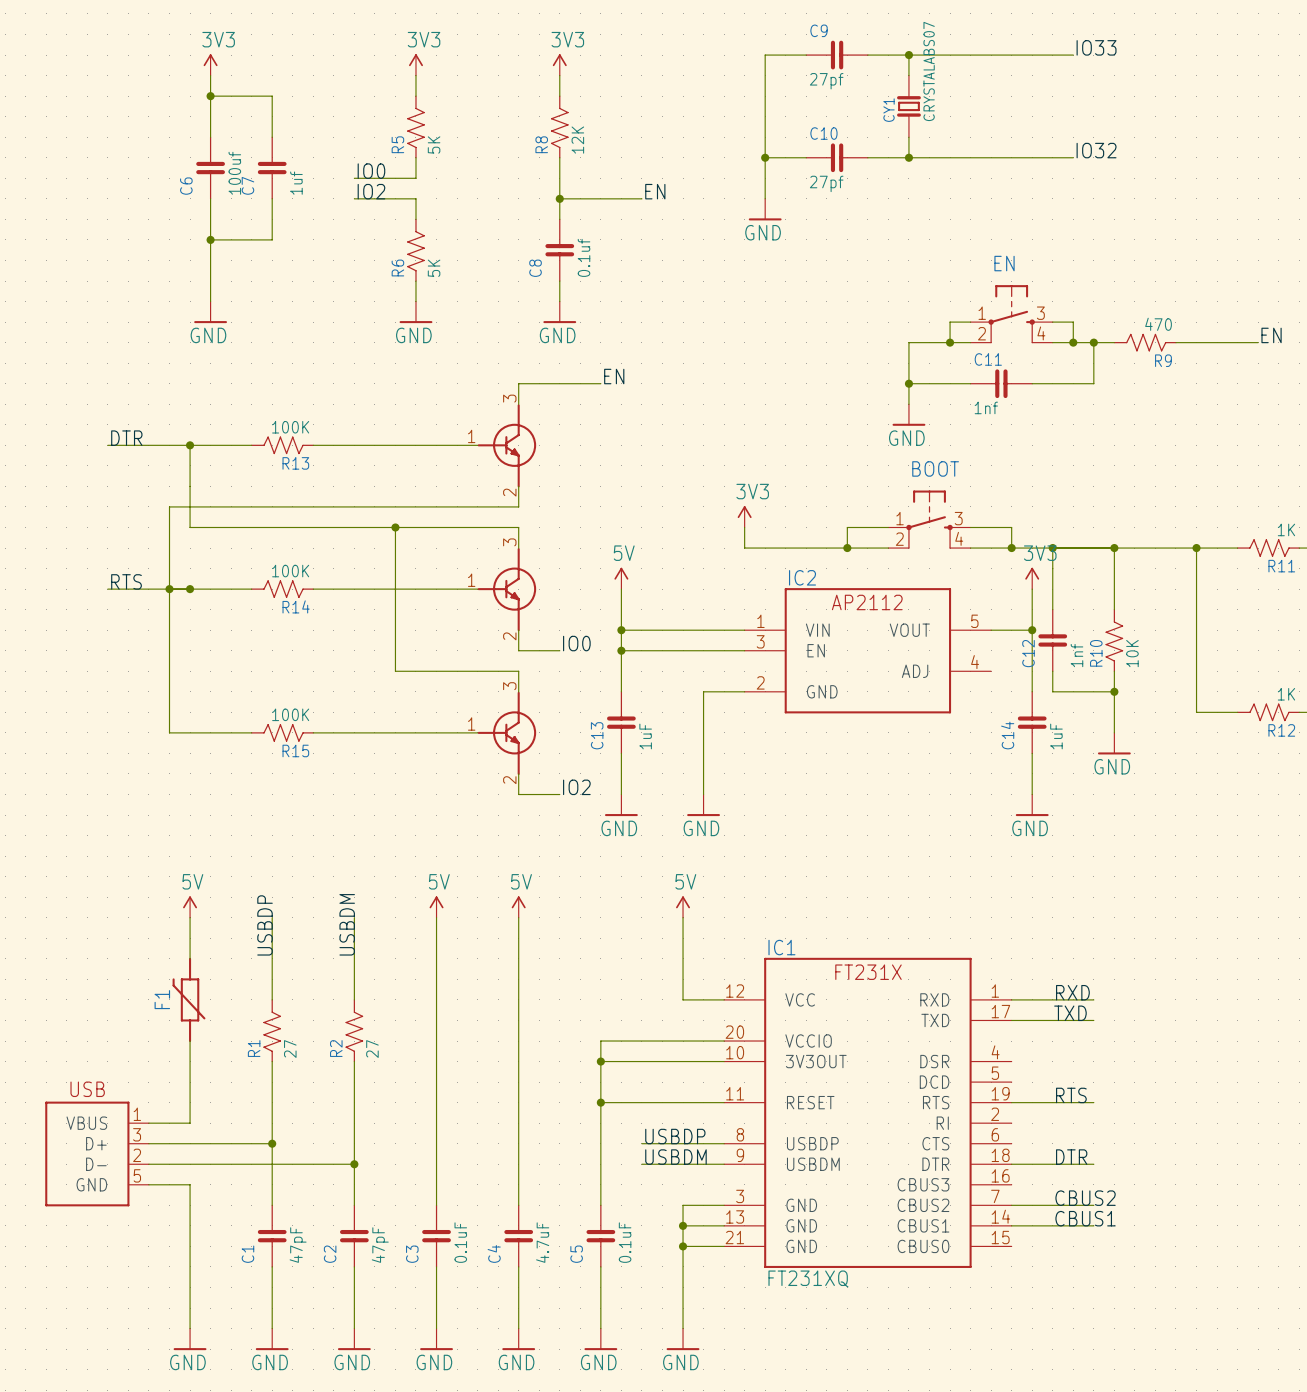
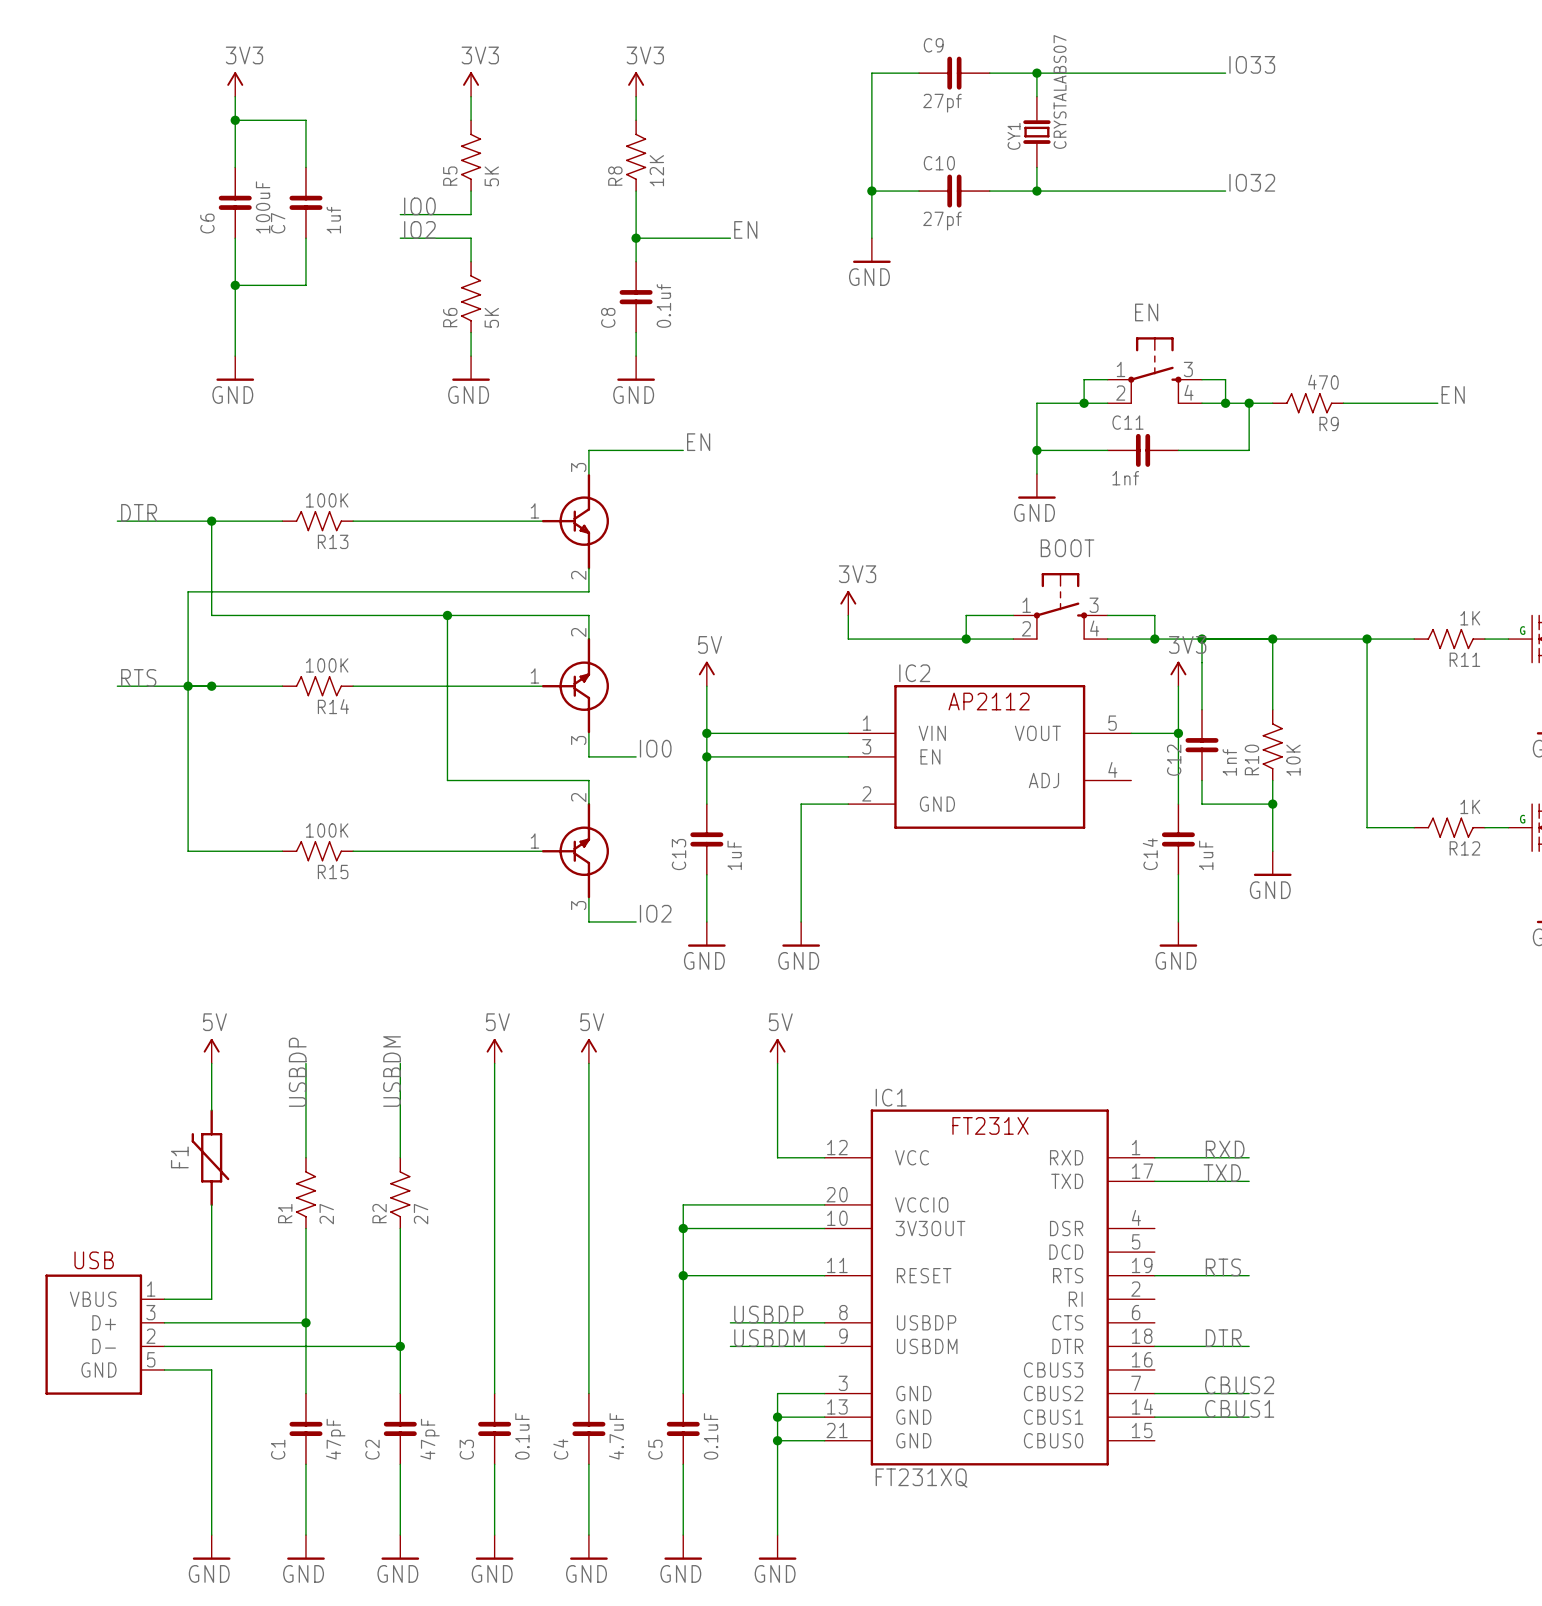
C6 value: 100uf (234, 173) -> 100uF (263, 207)
part flip: as is (506, 589) -> up-down (575, 685)
part flip: as is (506, 733) -> up-down (575, 850)

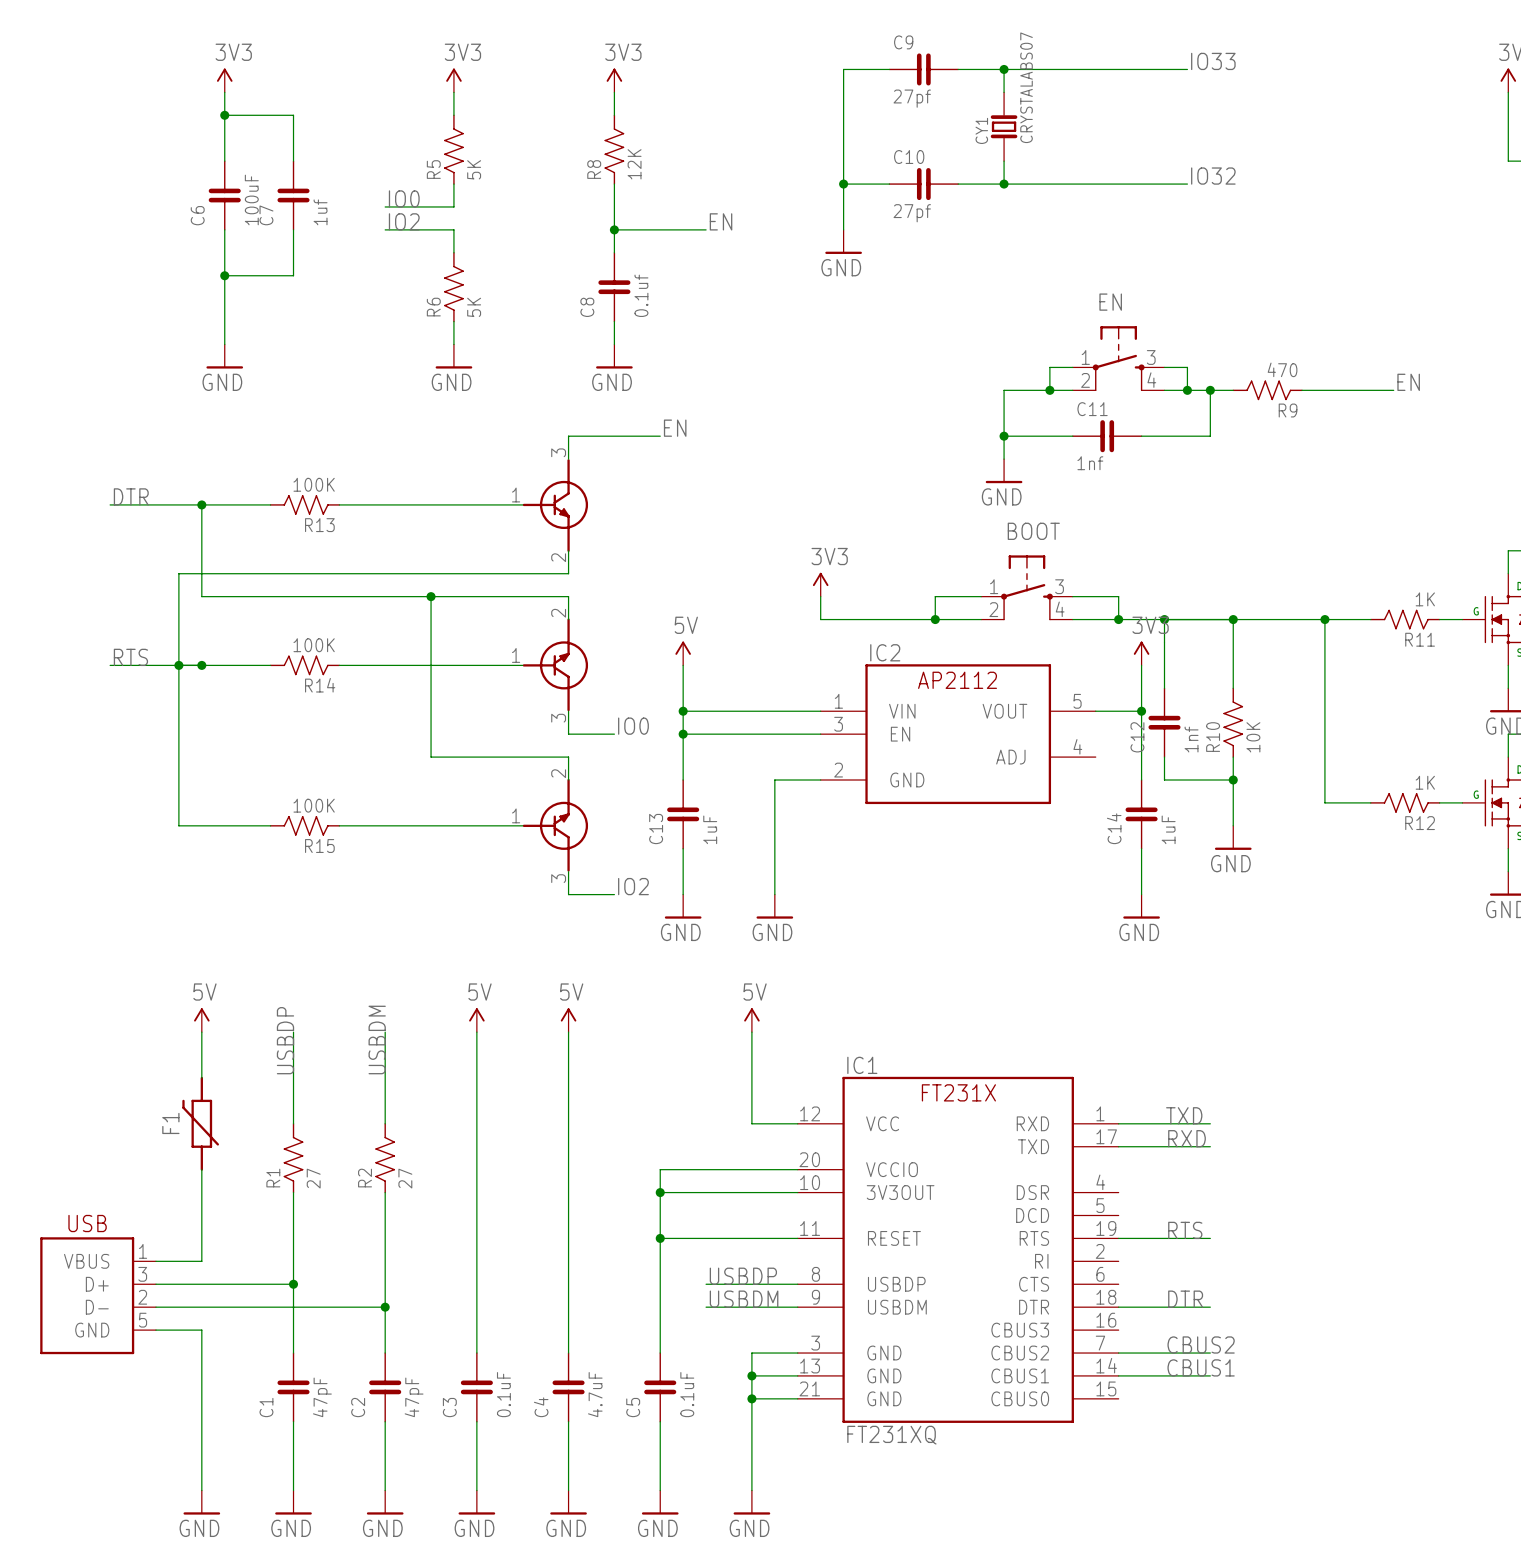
label: RXD (1225, 1149) -> TXD (1184, 1115)
label: TXD (1222, 1173) -> RXD (1187, 1138)

